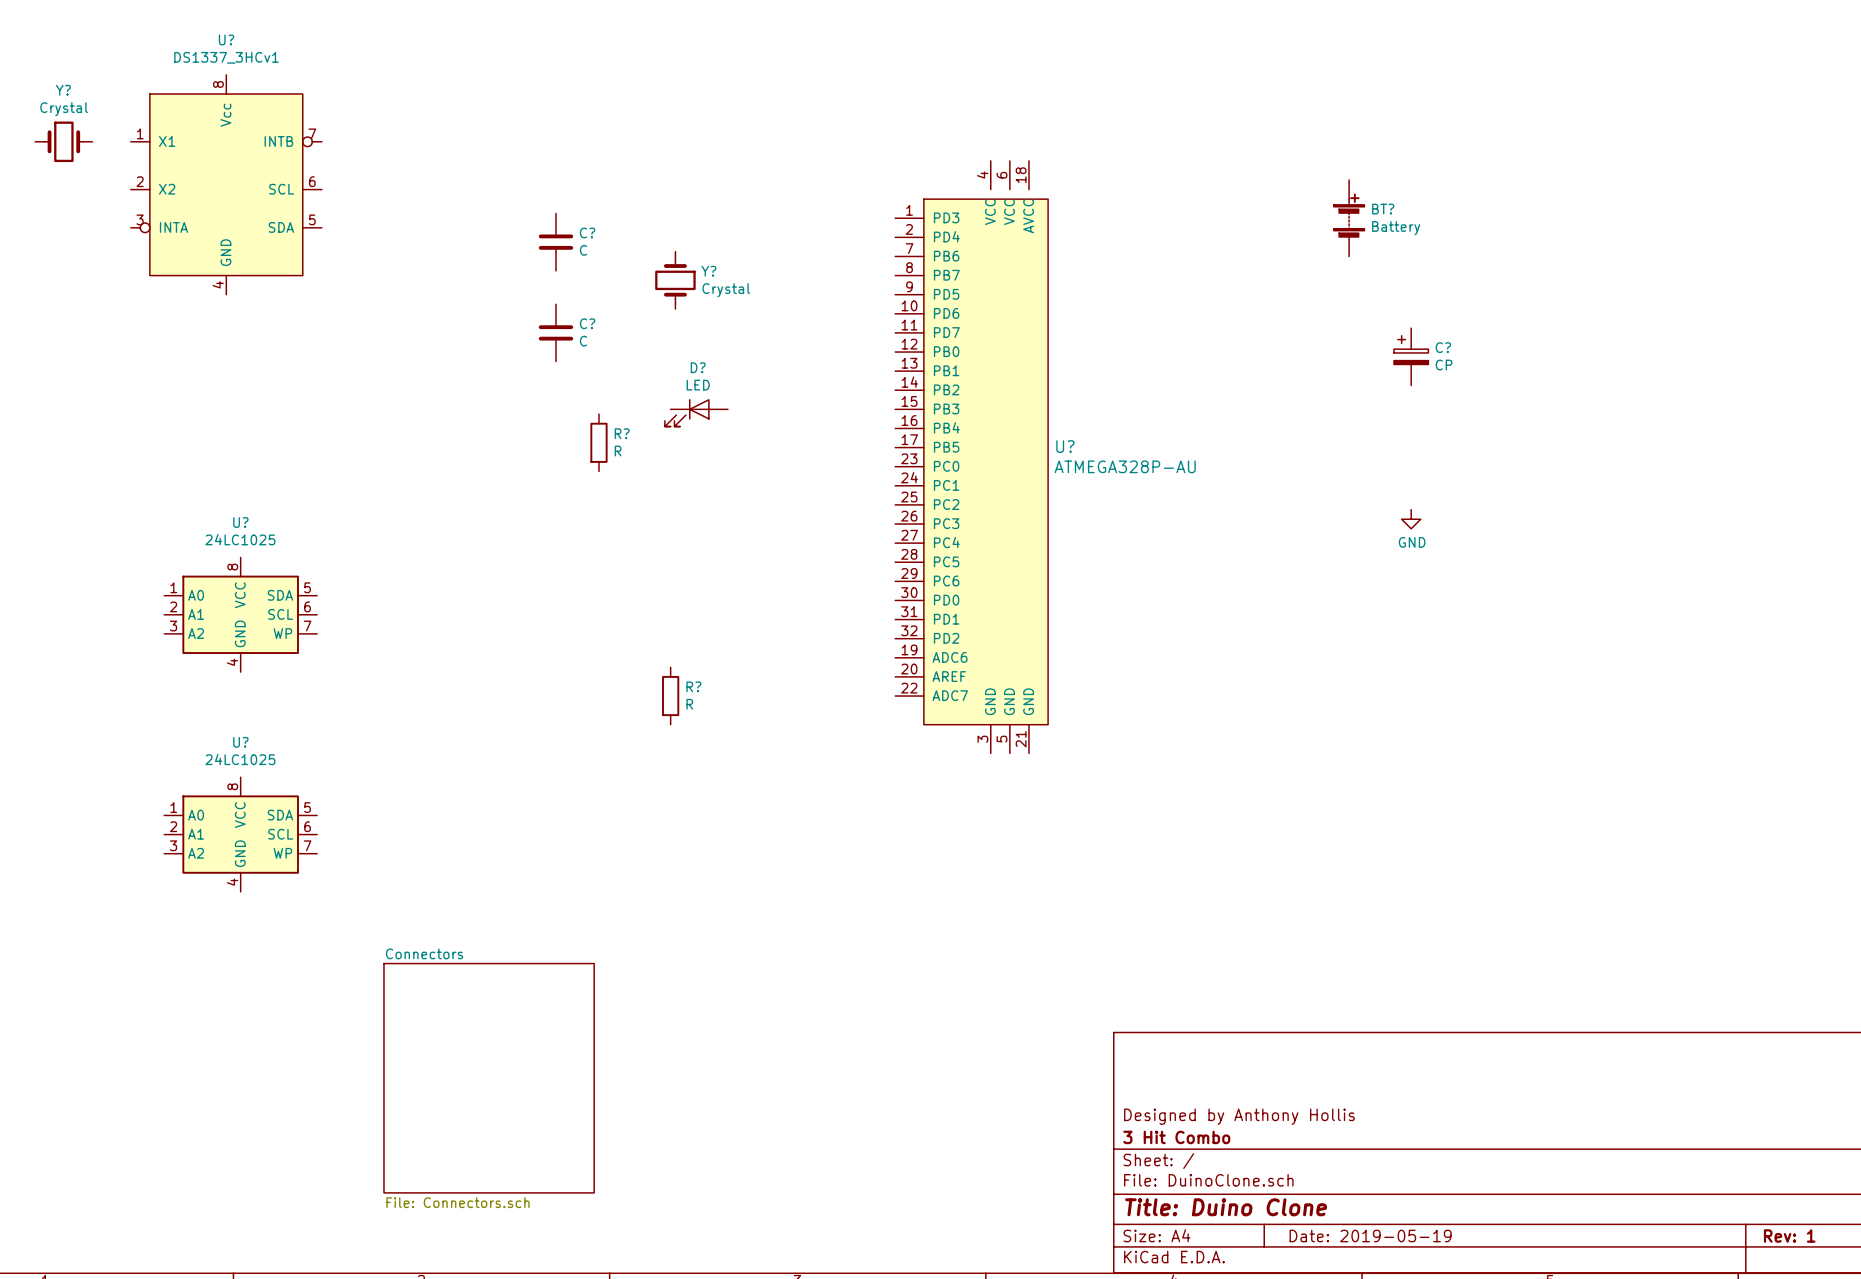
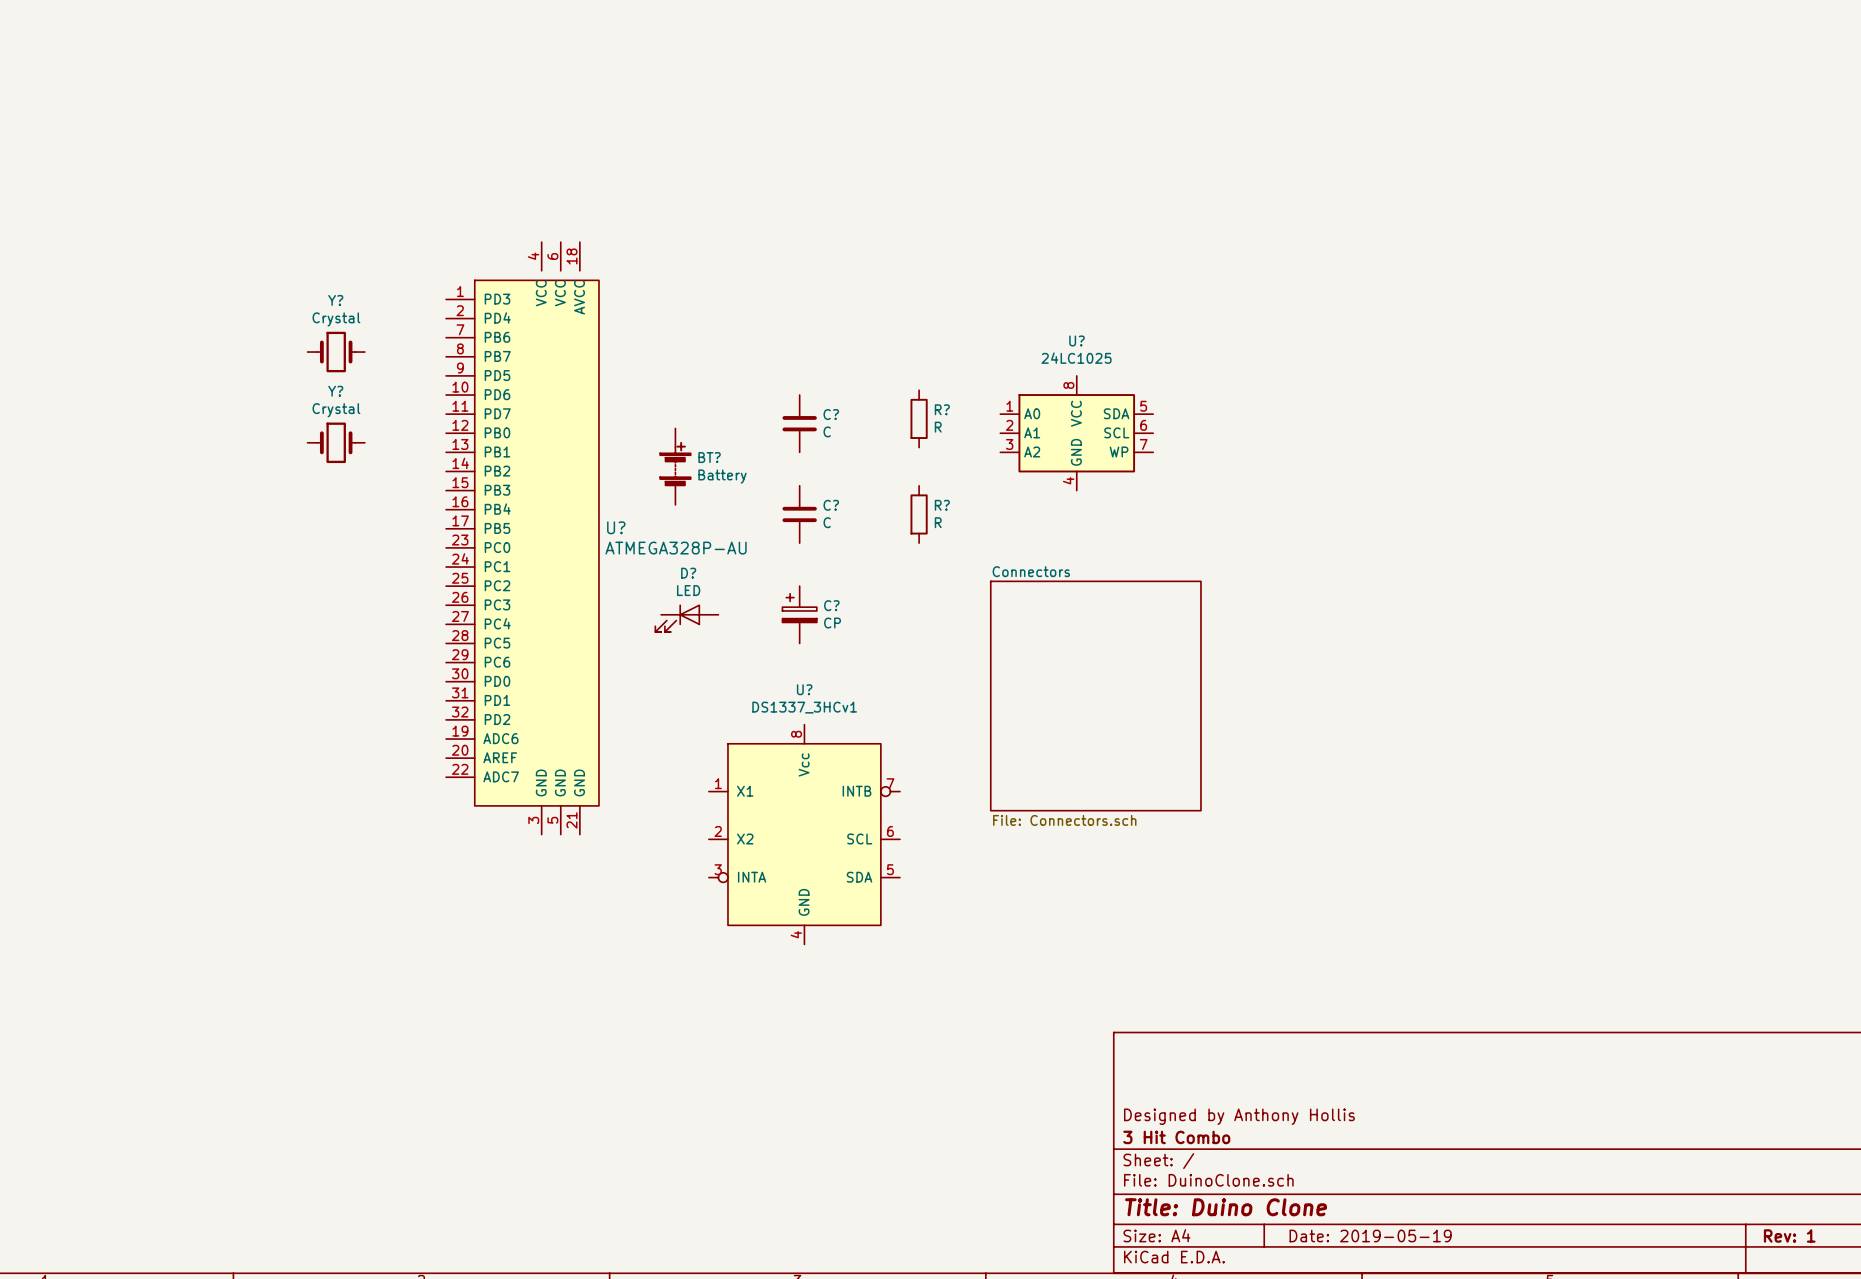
Y?: Crystal (63, 141) -> none
U?: DS1337_3HCv1 (226, 184) -> none
BT?: Battery (1349, 218) -> none
C?: C (555, 242) -> none
Y?: Crystal (675, 280) -> none
C?: C (555, 332) -> none
Y?: none -> Crystal (336, 352)
C?: CP (1411, 356) -> none
D?: LED (696, 412) -> none
R?: none -> R (919, 418)
C?: none -> C (799, 423)
U?: none -> 24LC1025 (1076, 433)
Y?: none -> Crystal (336, 442)
R?: R (598, 442) -> none
U?: ATMEGA328P-AU (971, 457) -> none
BT?: none -> Battery (675, 466)
C?: none -> C (799, 514)
R?: none -> R (919, 514)
power symbol: GND (1411, 519) -> none
U?: none -> ATMEGA328P-AU (522, 538)
U?: 24LC1025 (240, 614) -> none
C?: none -> CP (799, 614)
D?: none -> LED (686, 618)
R?: R (670, 696) -> none
sheet Connectors: none -> File: Connectors.sch (1095, 696)
U?: 24LC1025 (240, 834) -> none
U?: none -> DS1337_3HCv1 (804, 834)
sheet Connectors: File: Connectors.sch (489, 1078) -> none

